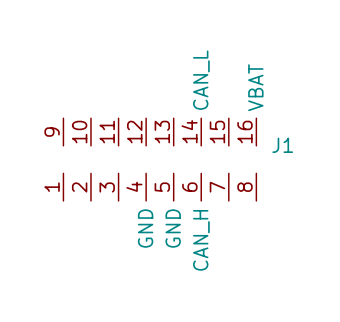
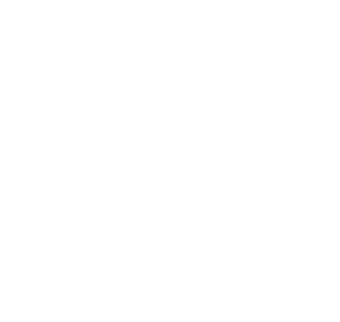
J1: (159, 159) -> none

